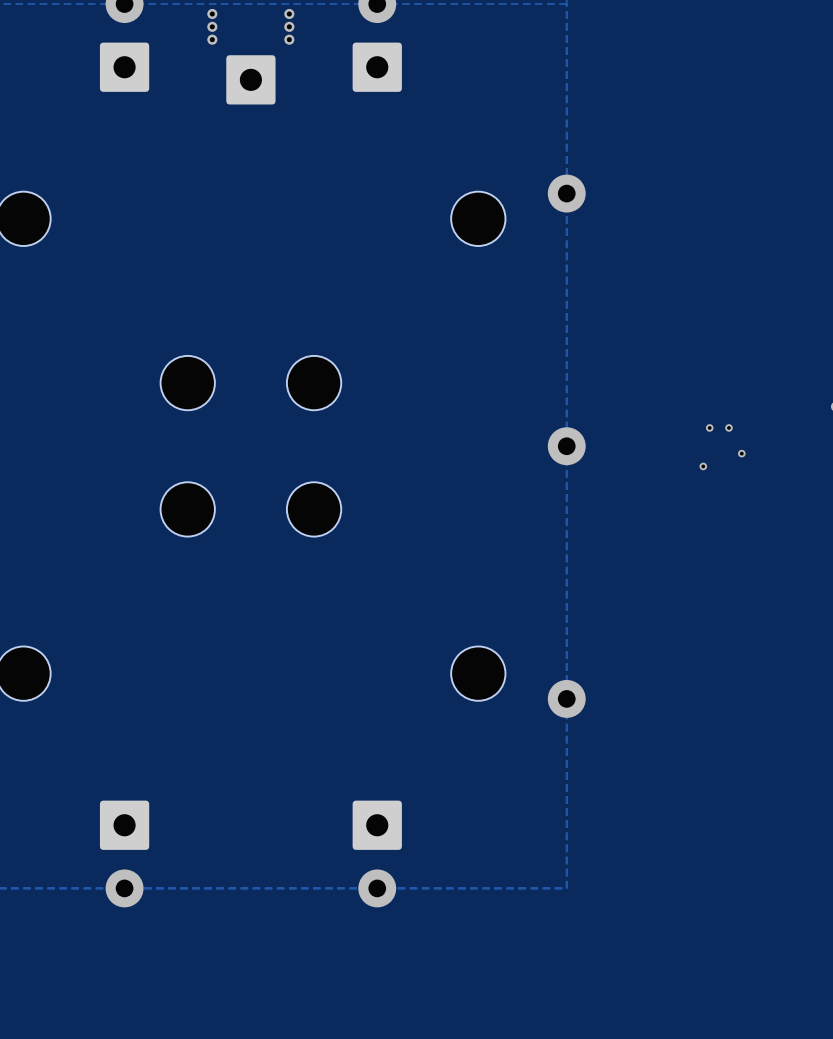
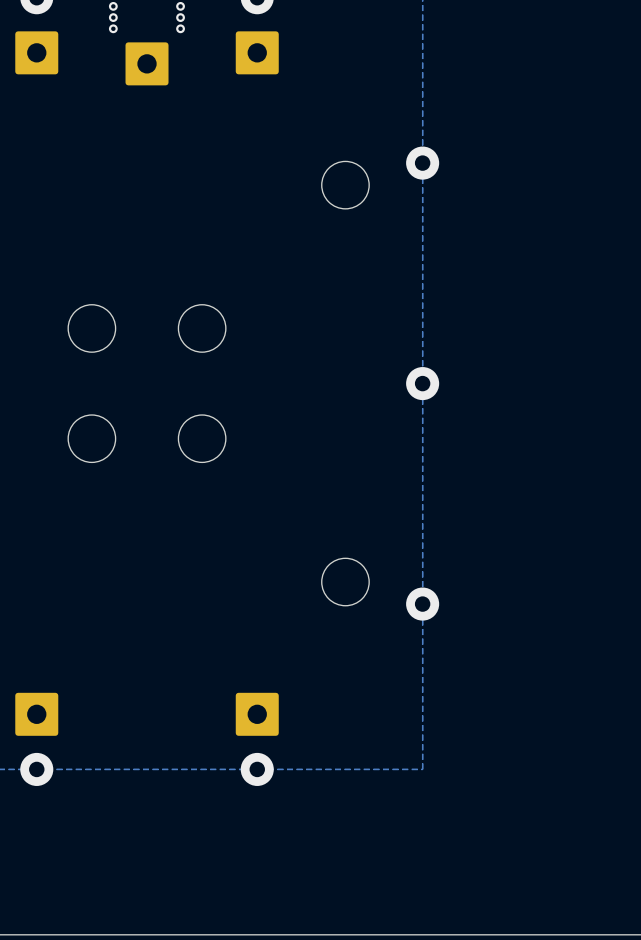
via: (709, 427) -> none
via: (728, 427) -> none
via: (741, 453) -> none
via: (703, 466) -> none

